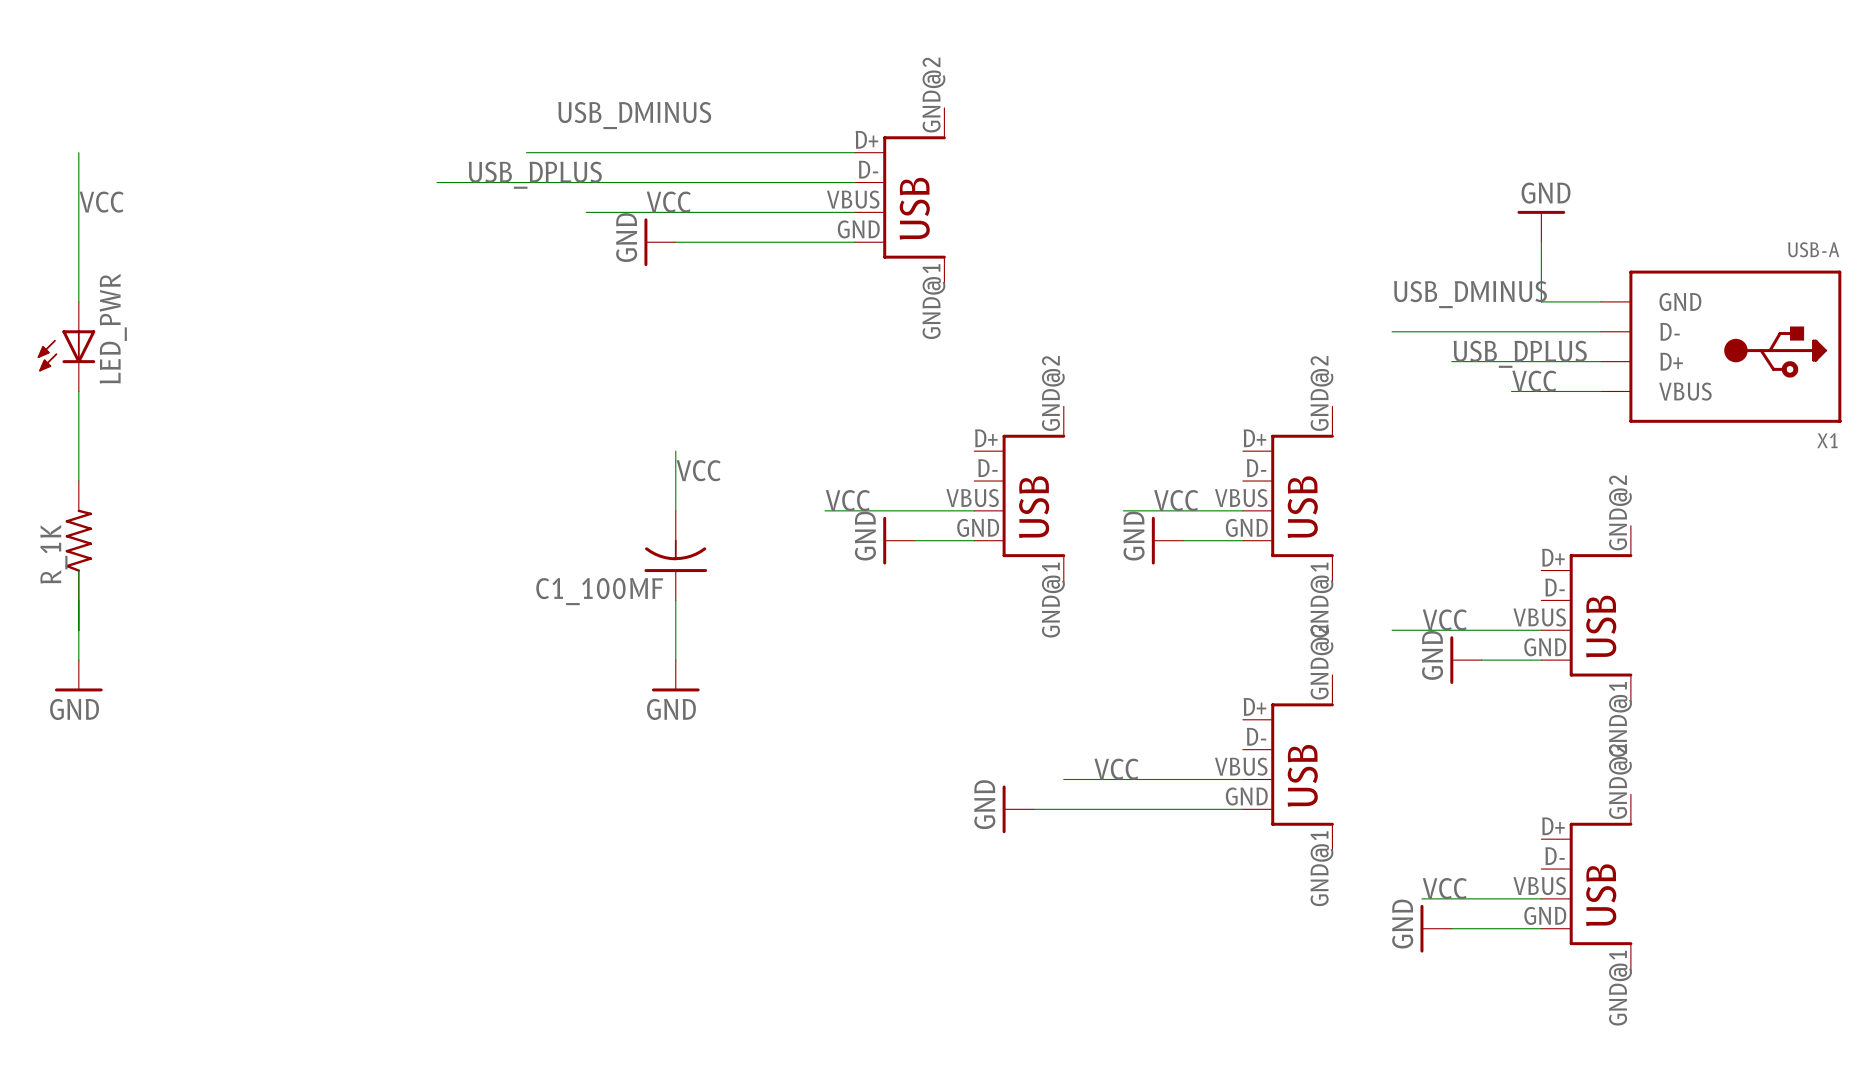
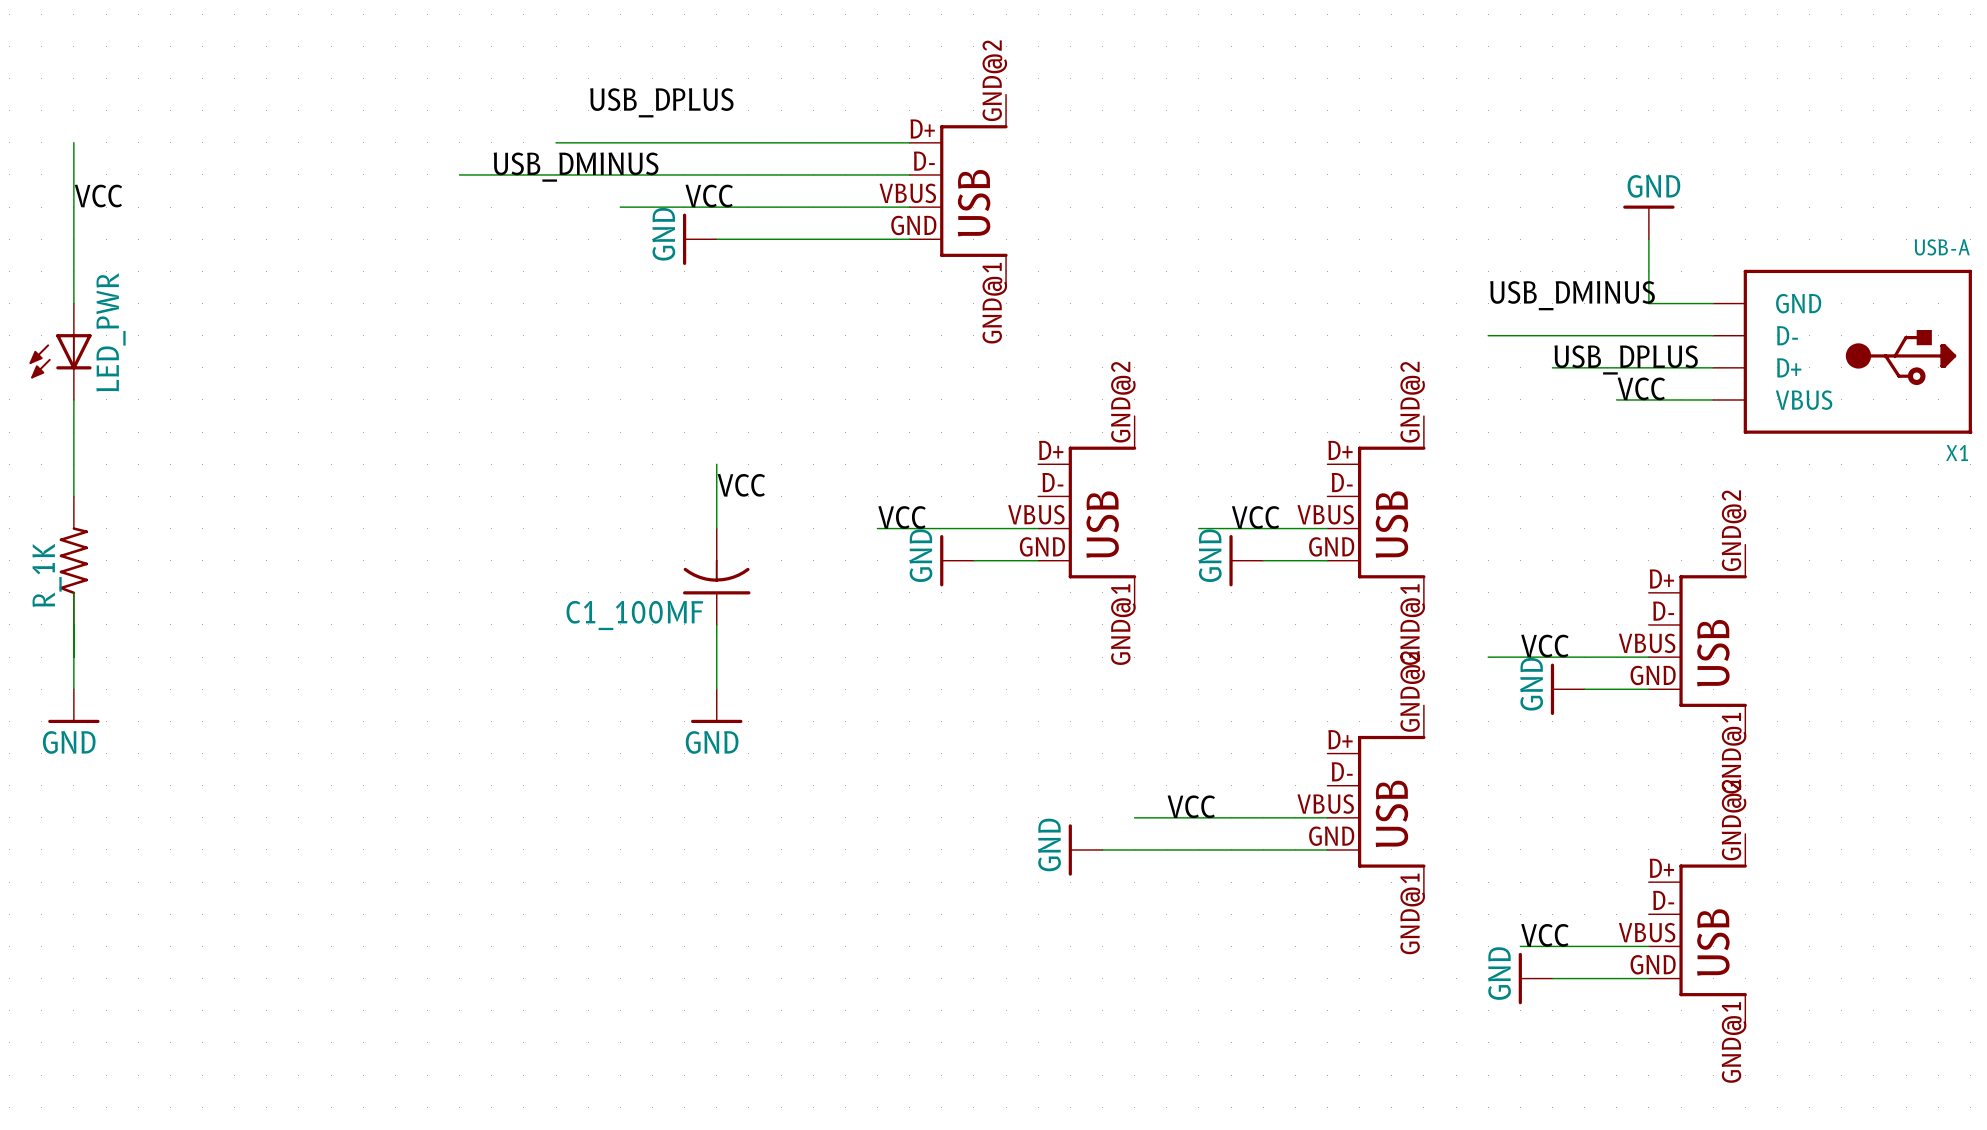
label: USB_DMINUS (634, 115) -> USB_DPLUS (661, 102)
label: USB_DPLUS (535, 175) -> USB_DMINUS (576, 167)

